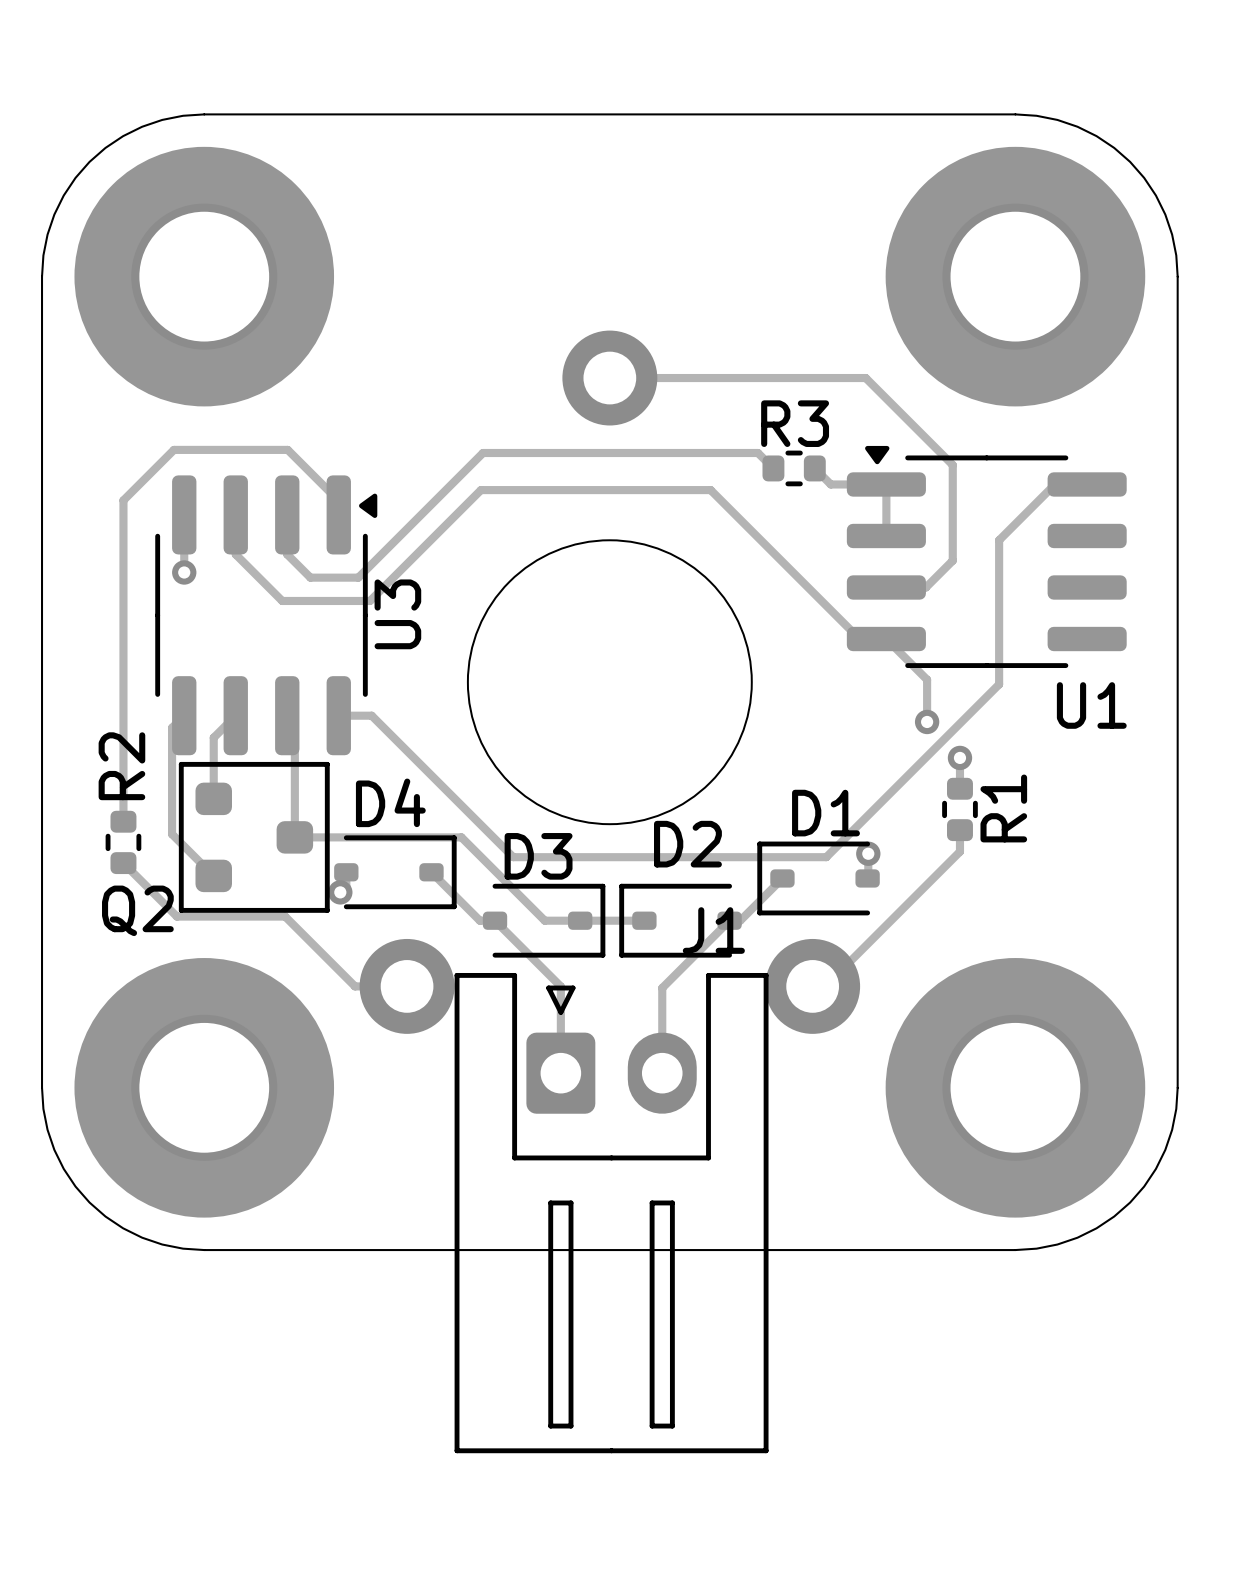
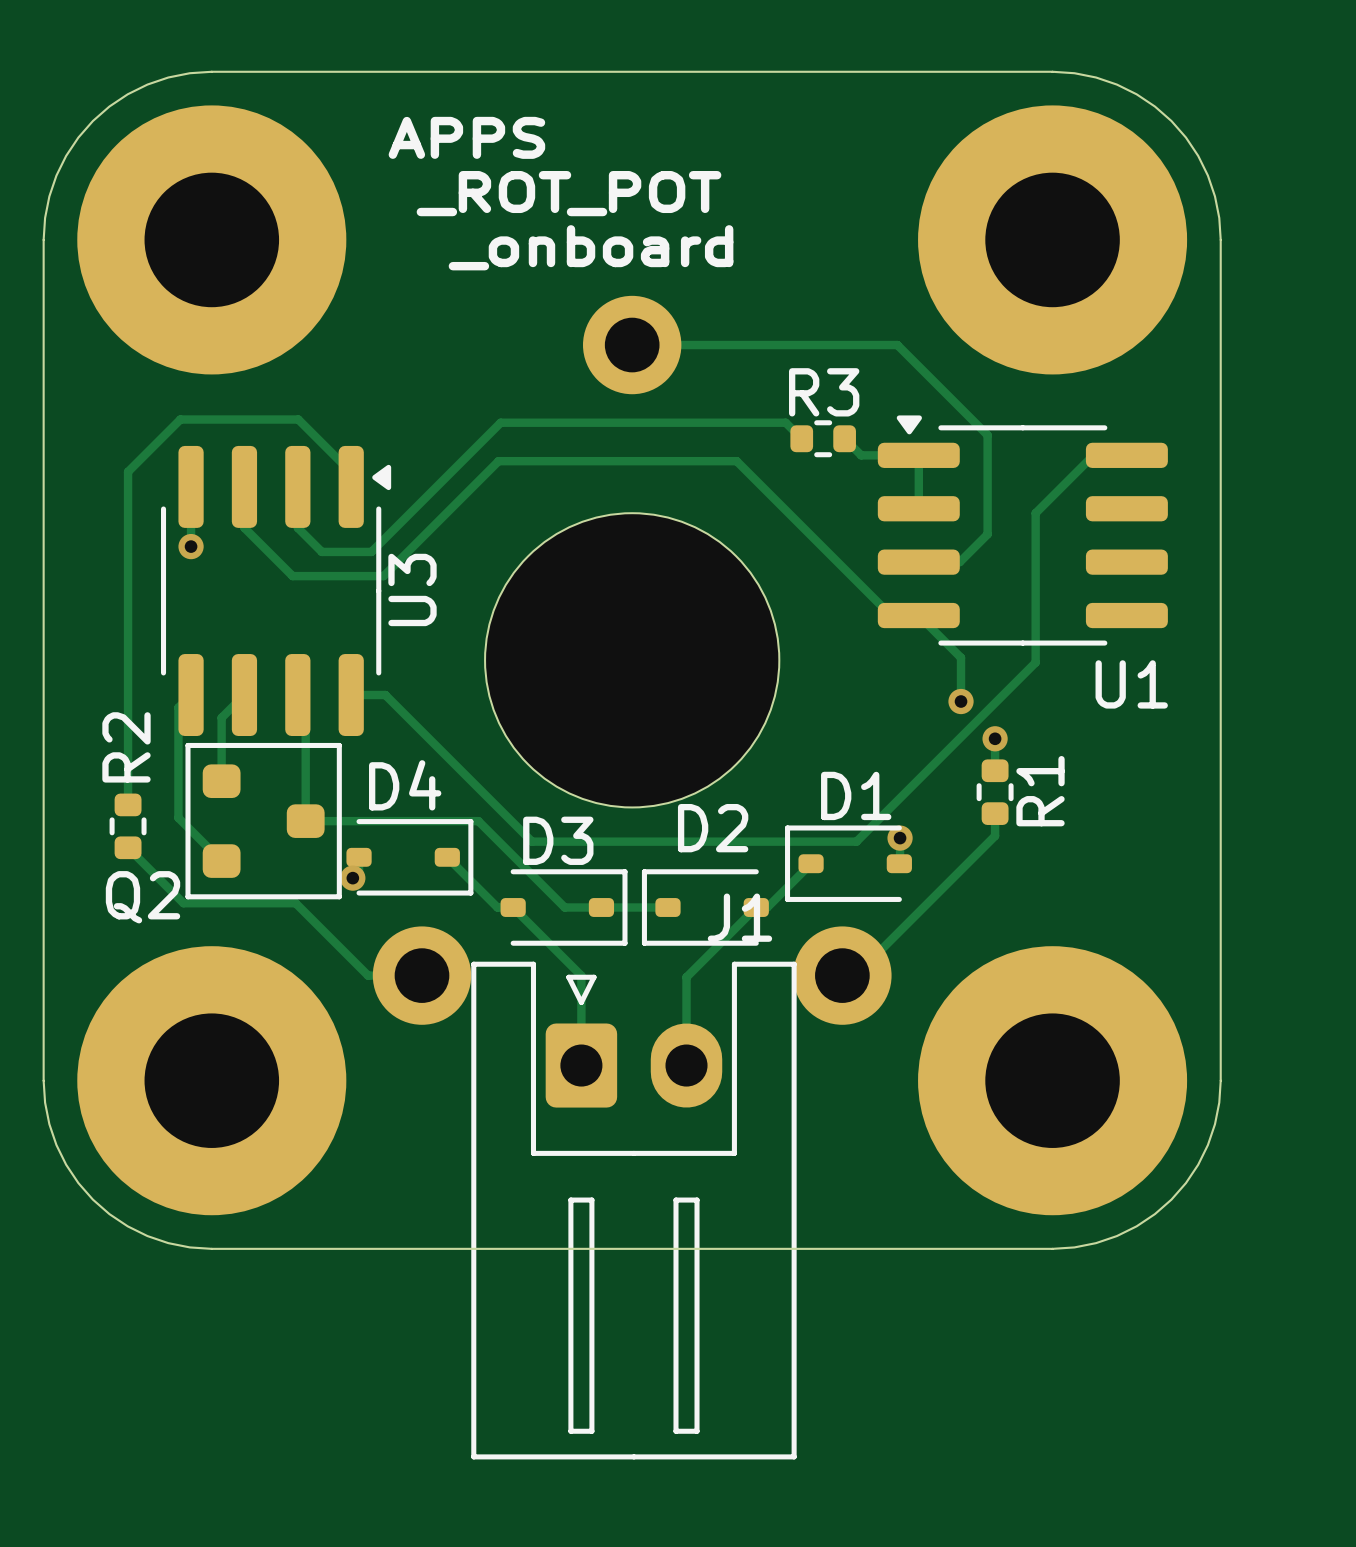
text: none -> APPS (466, 137)
text: none -> _ROT_POT (569, 193)
text: none -> _onboard (591, 247)

